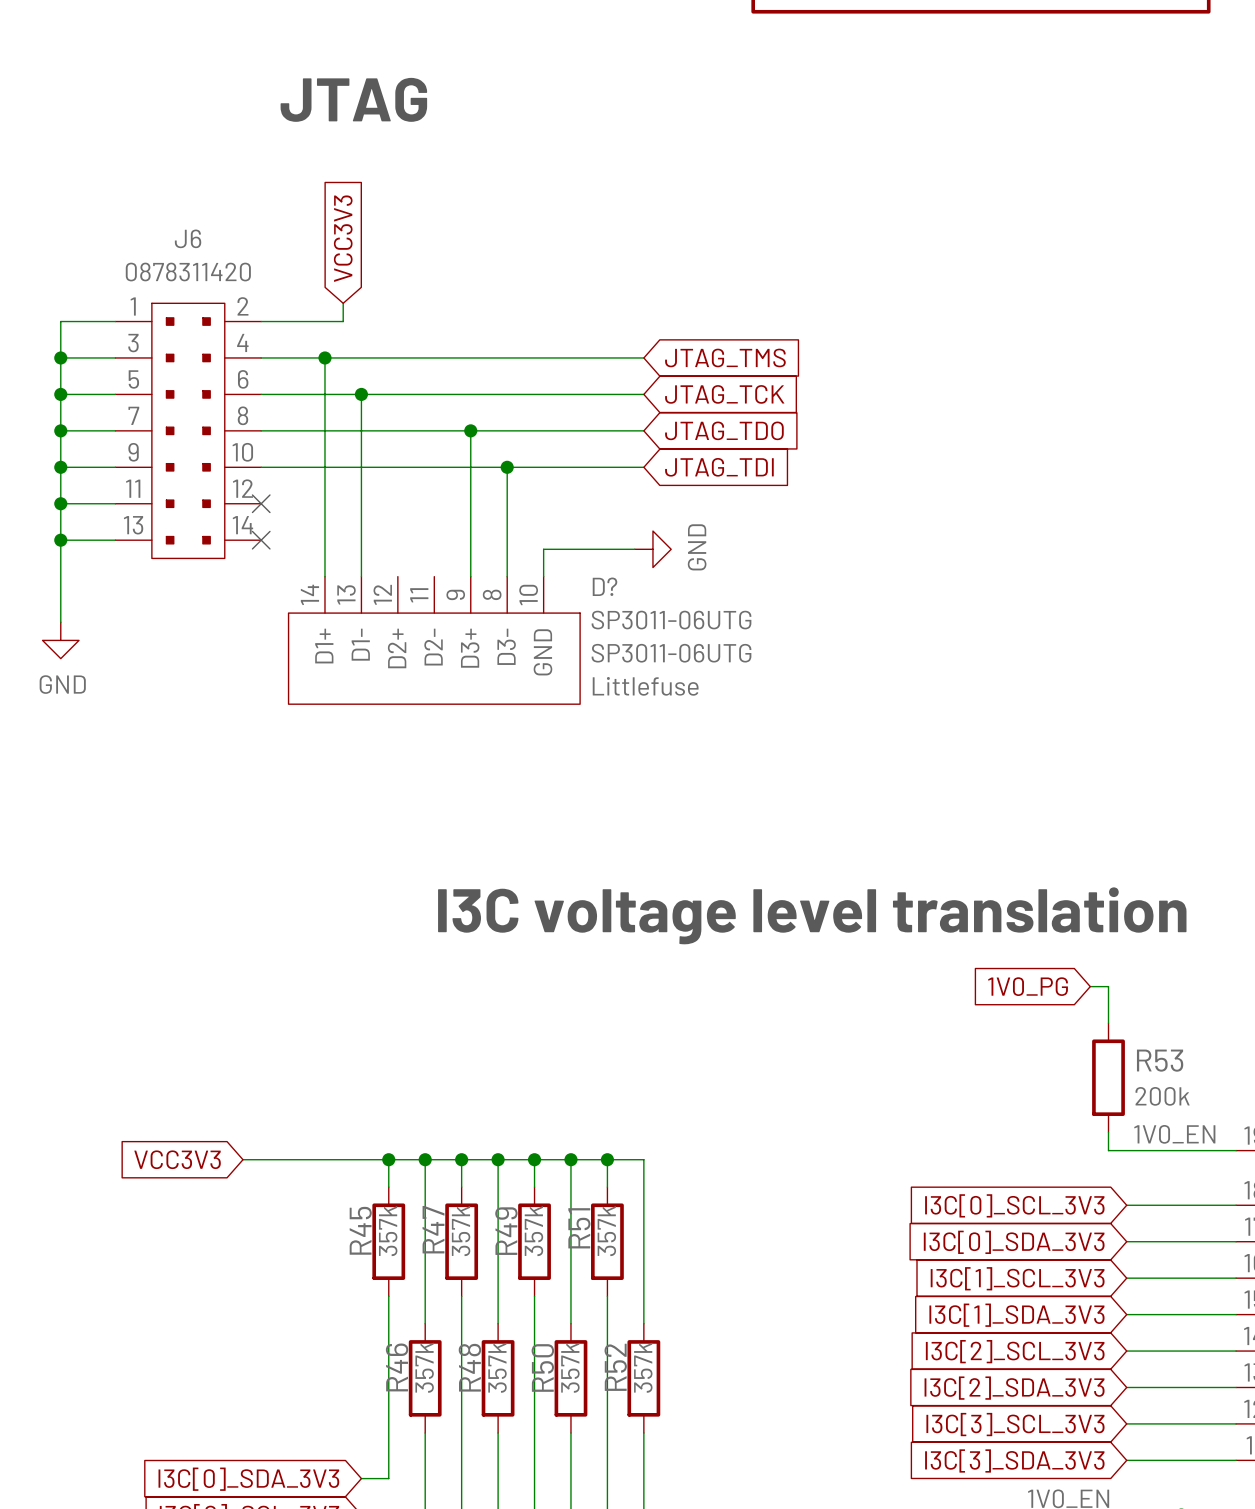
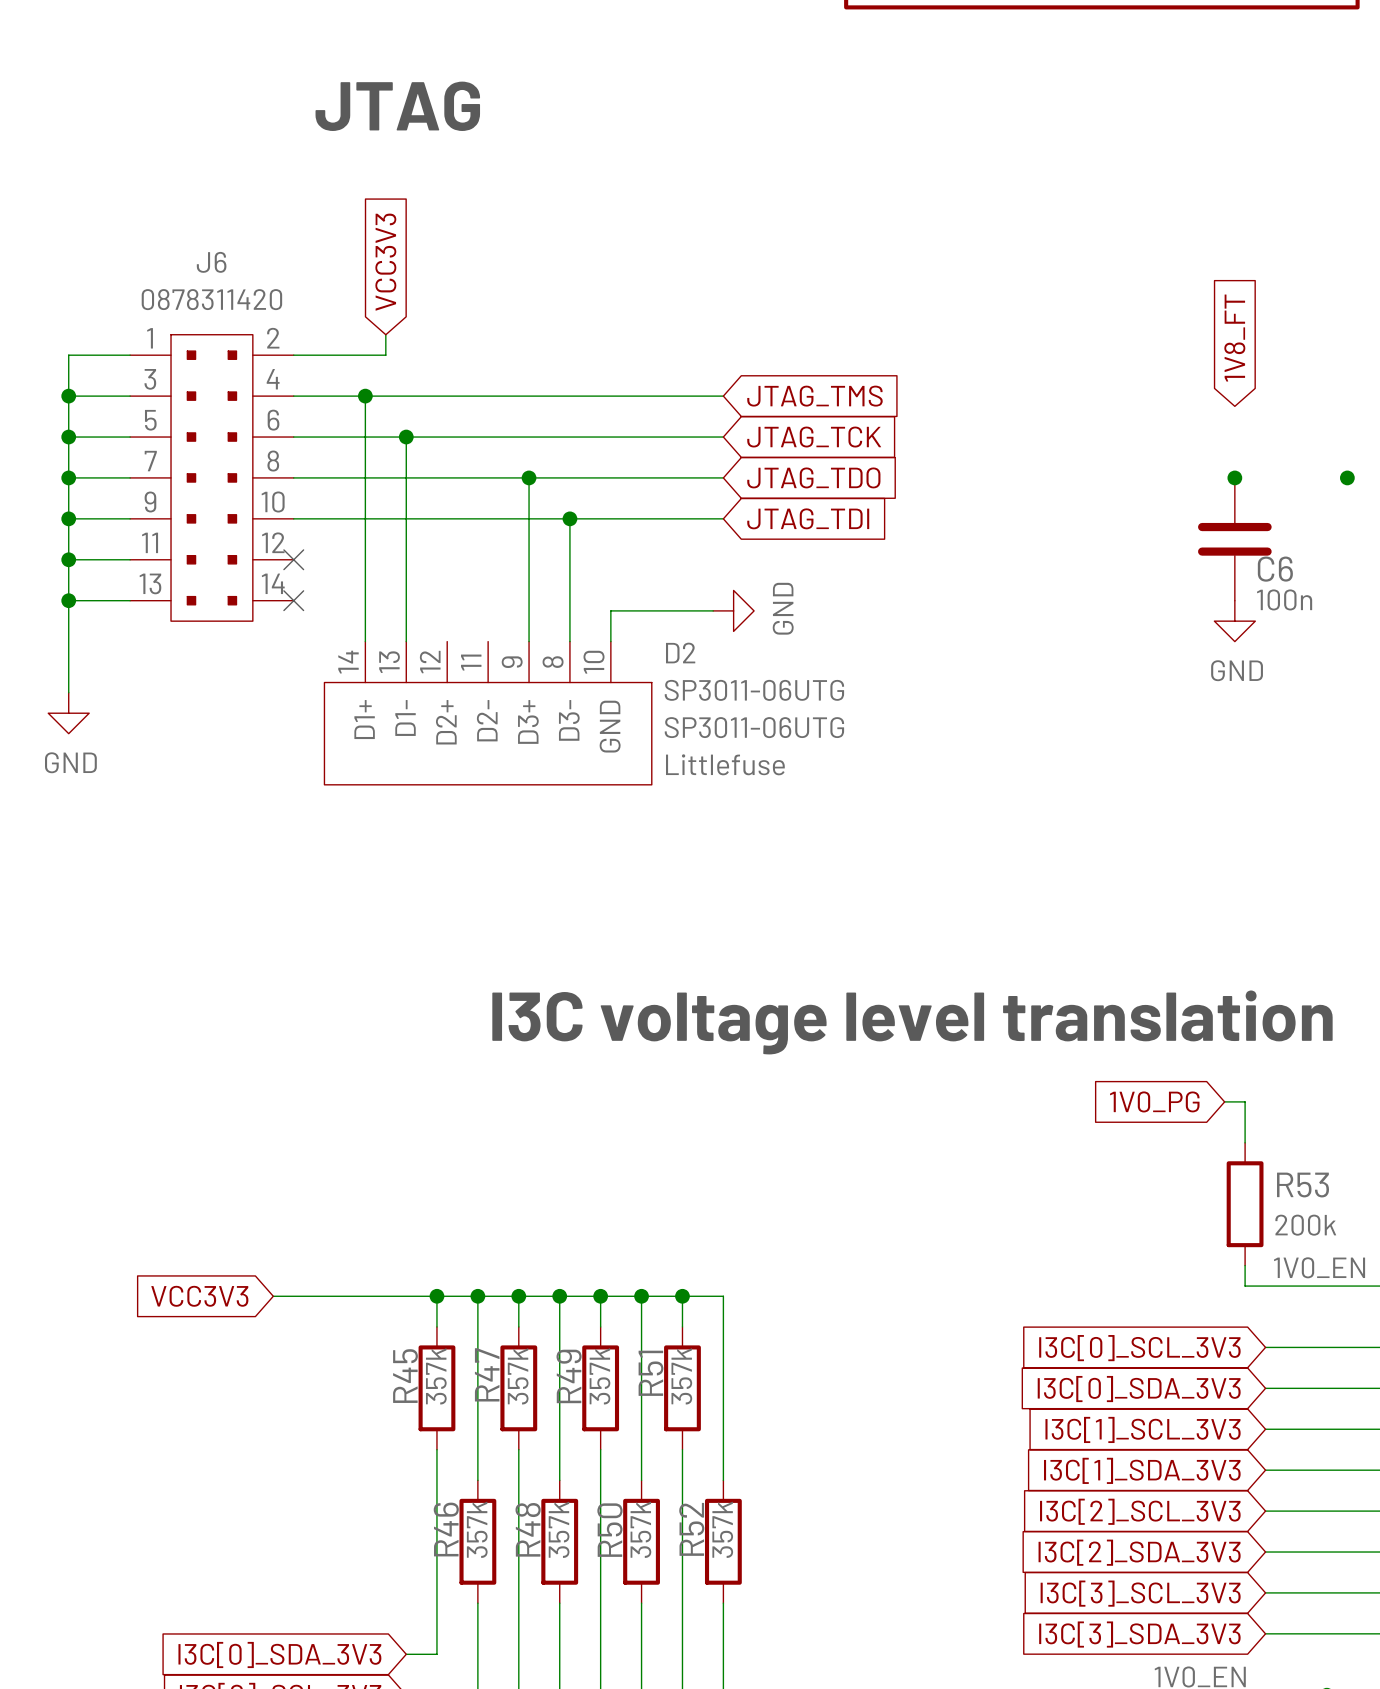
global label: none -> 1V8_FT (1234, 338)
junction: none -> (1234, 477)
junction: none -> (1347, 477)
C6: none -> (1234, 539)
power symbol: none -> GND (1234, 621)
D? name: D? (605, 586) -> D2 (680, 653)

